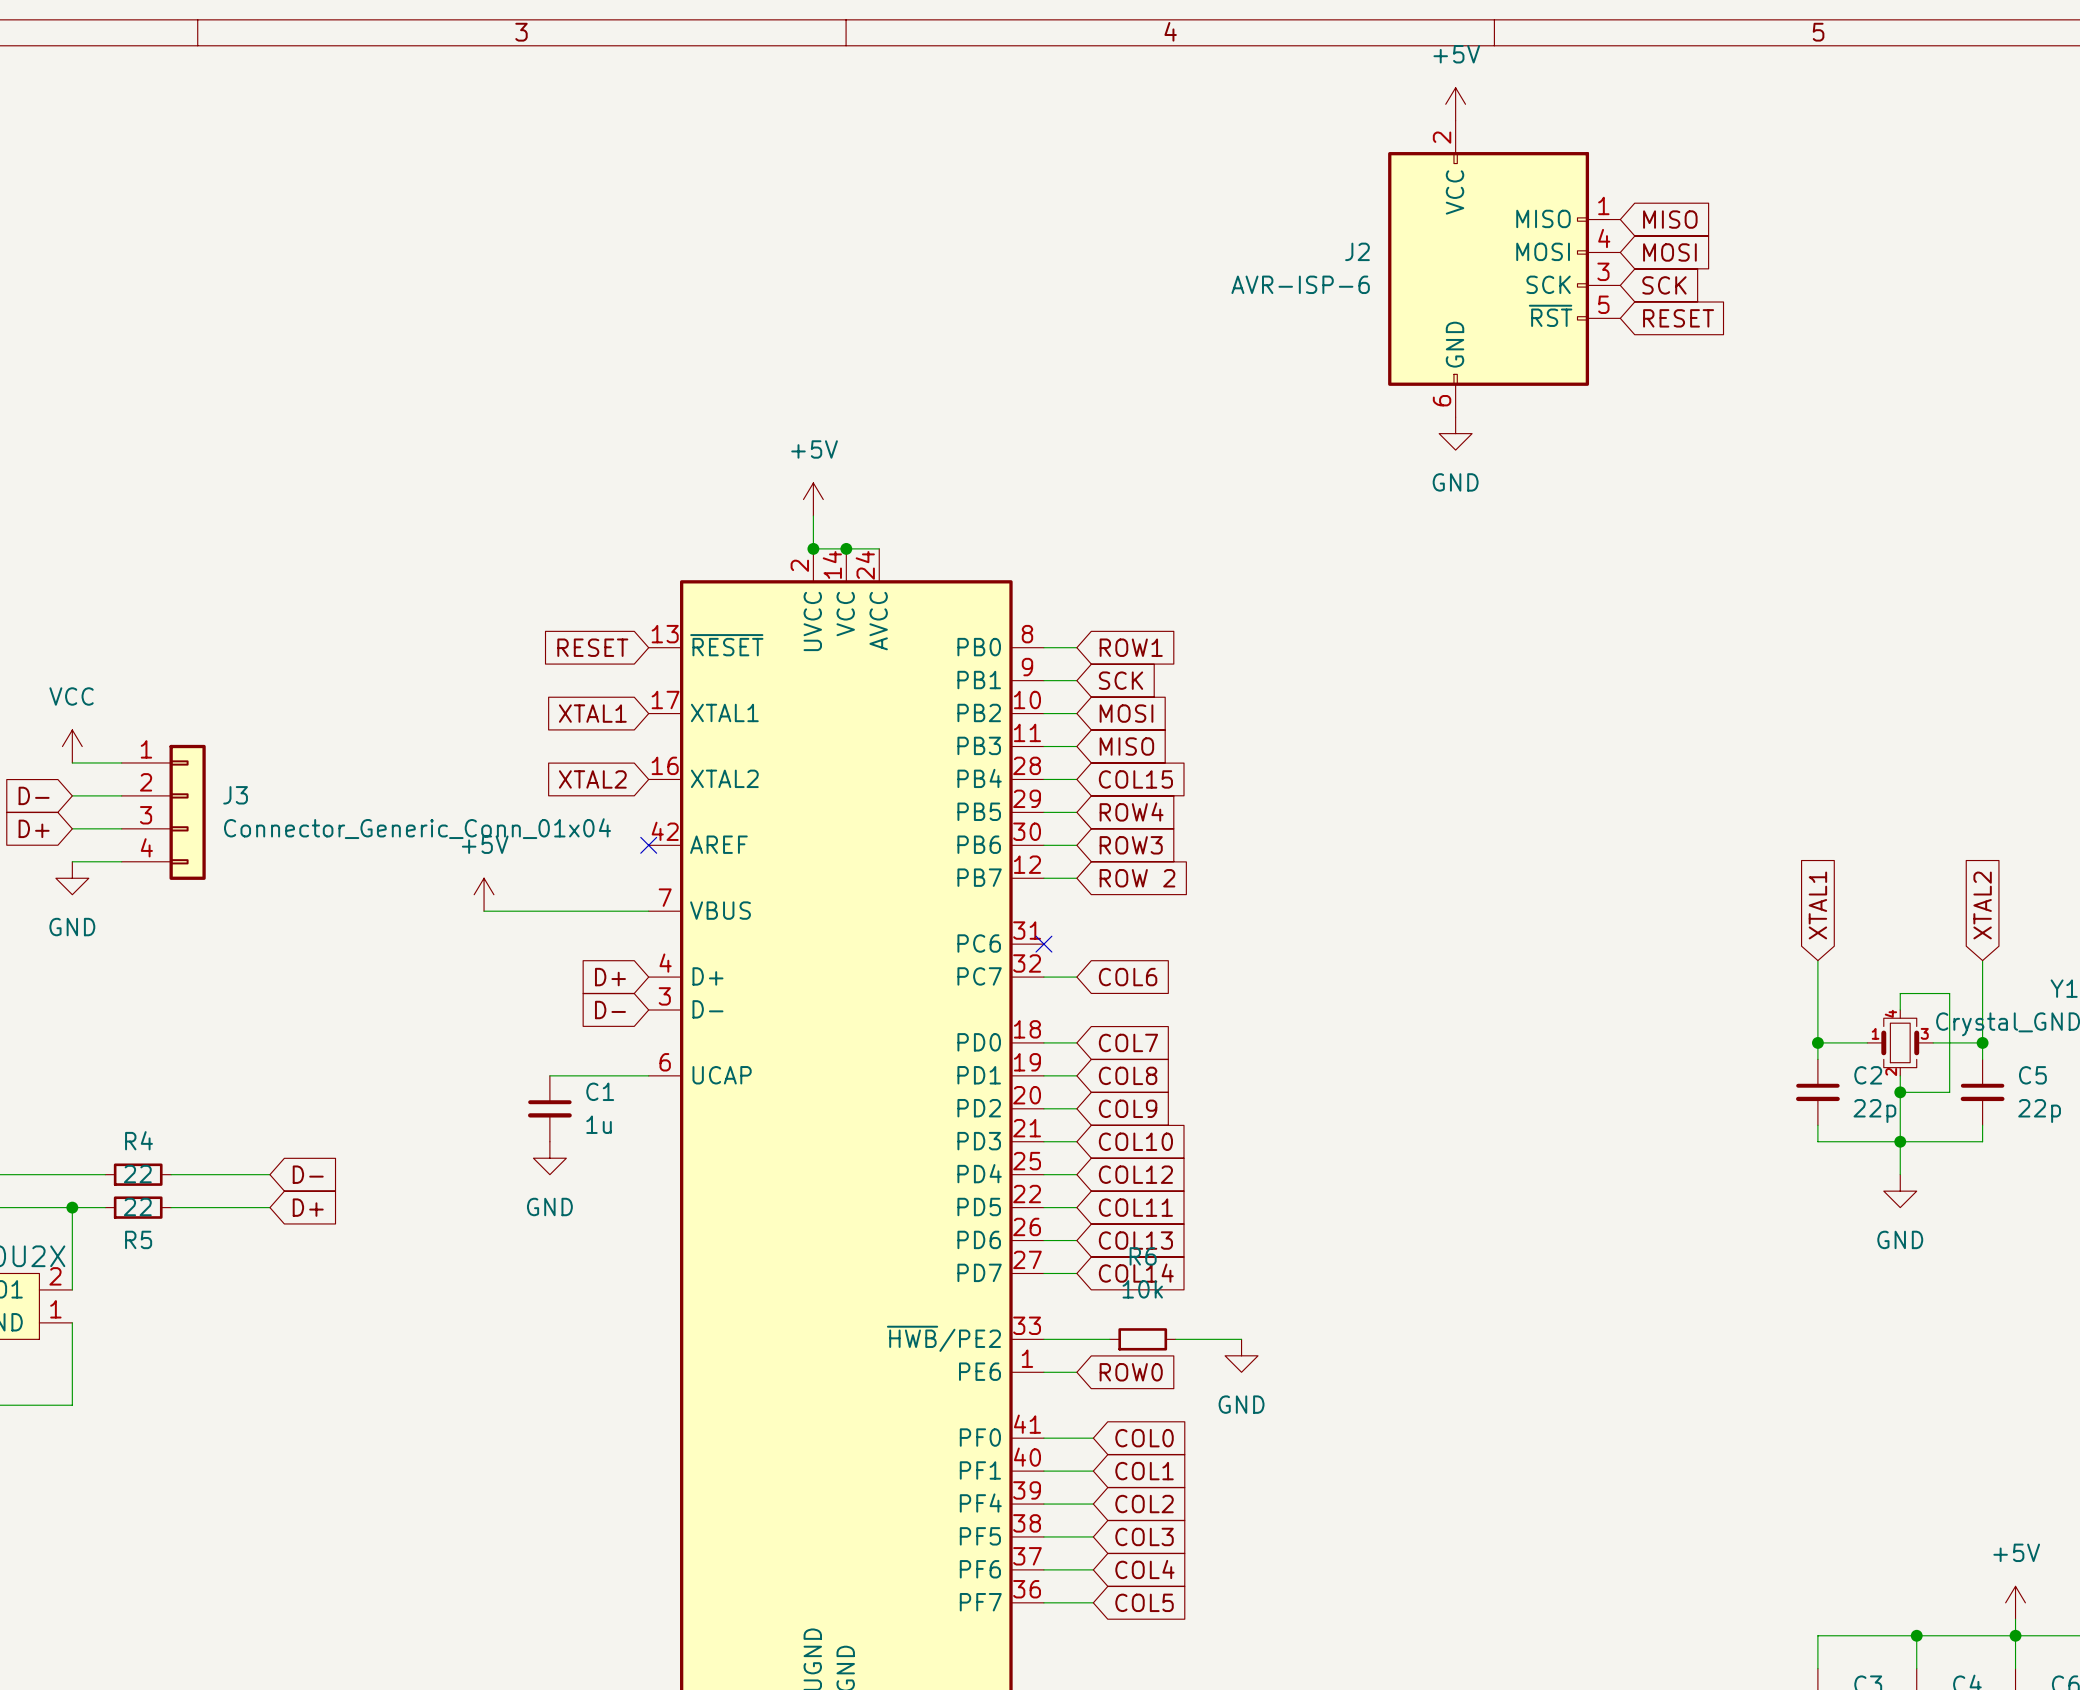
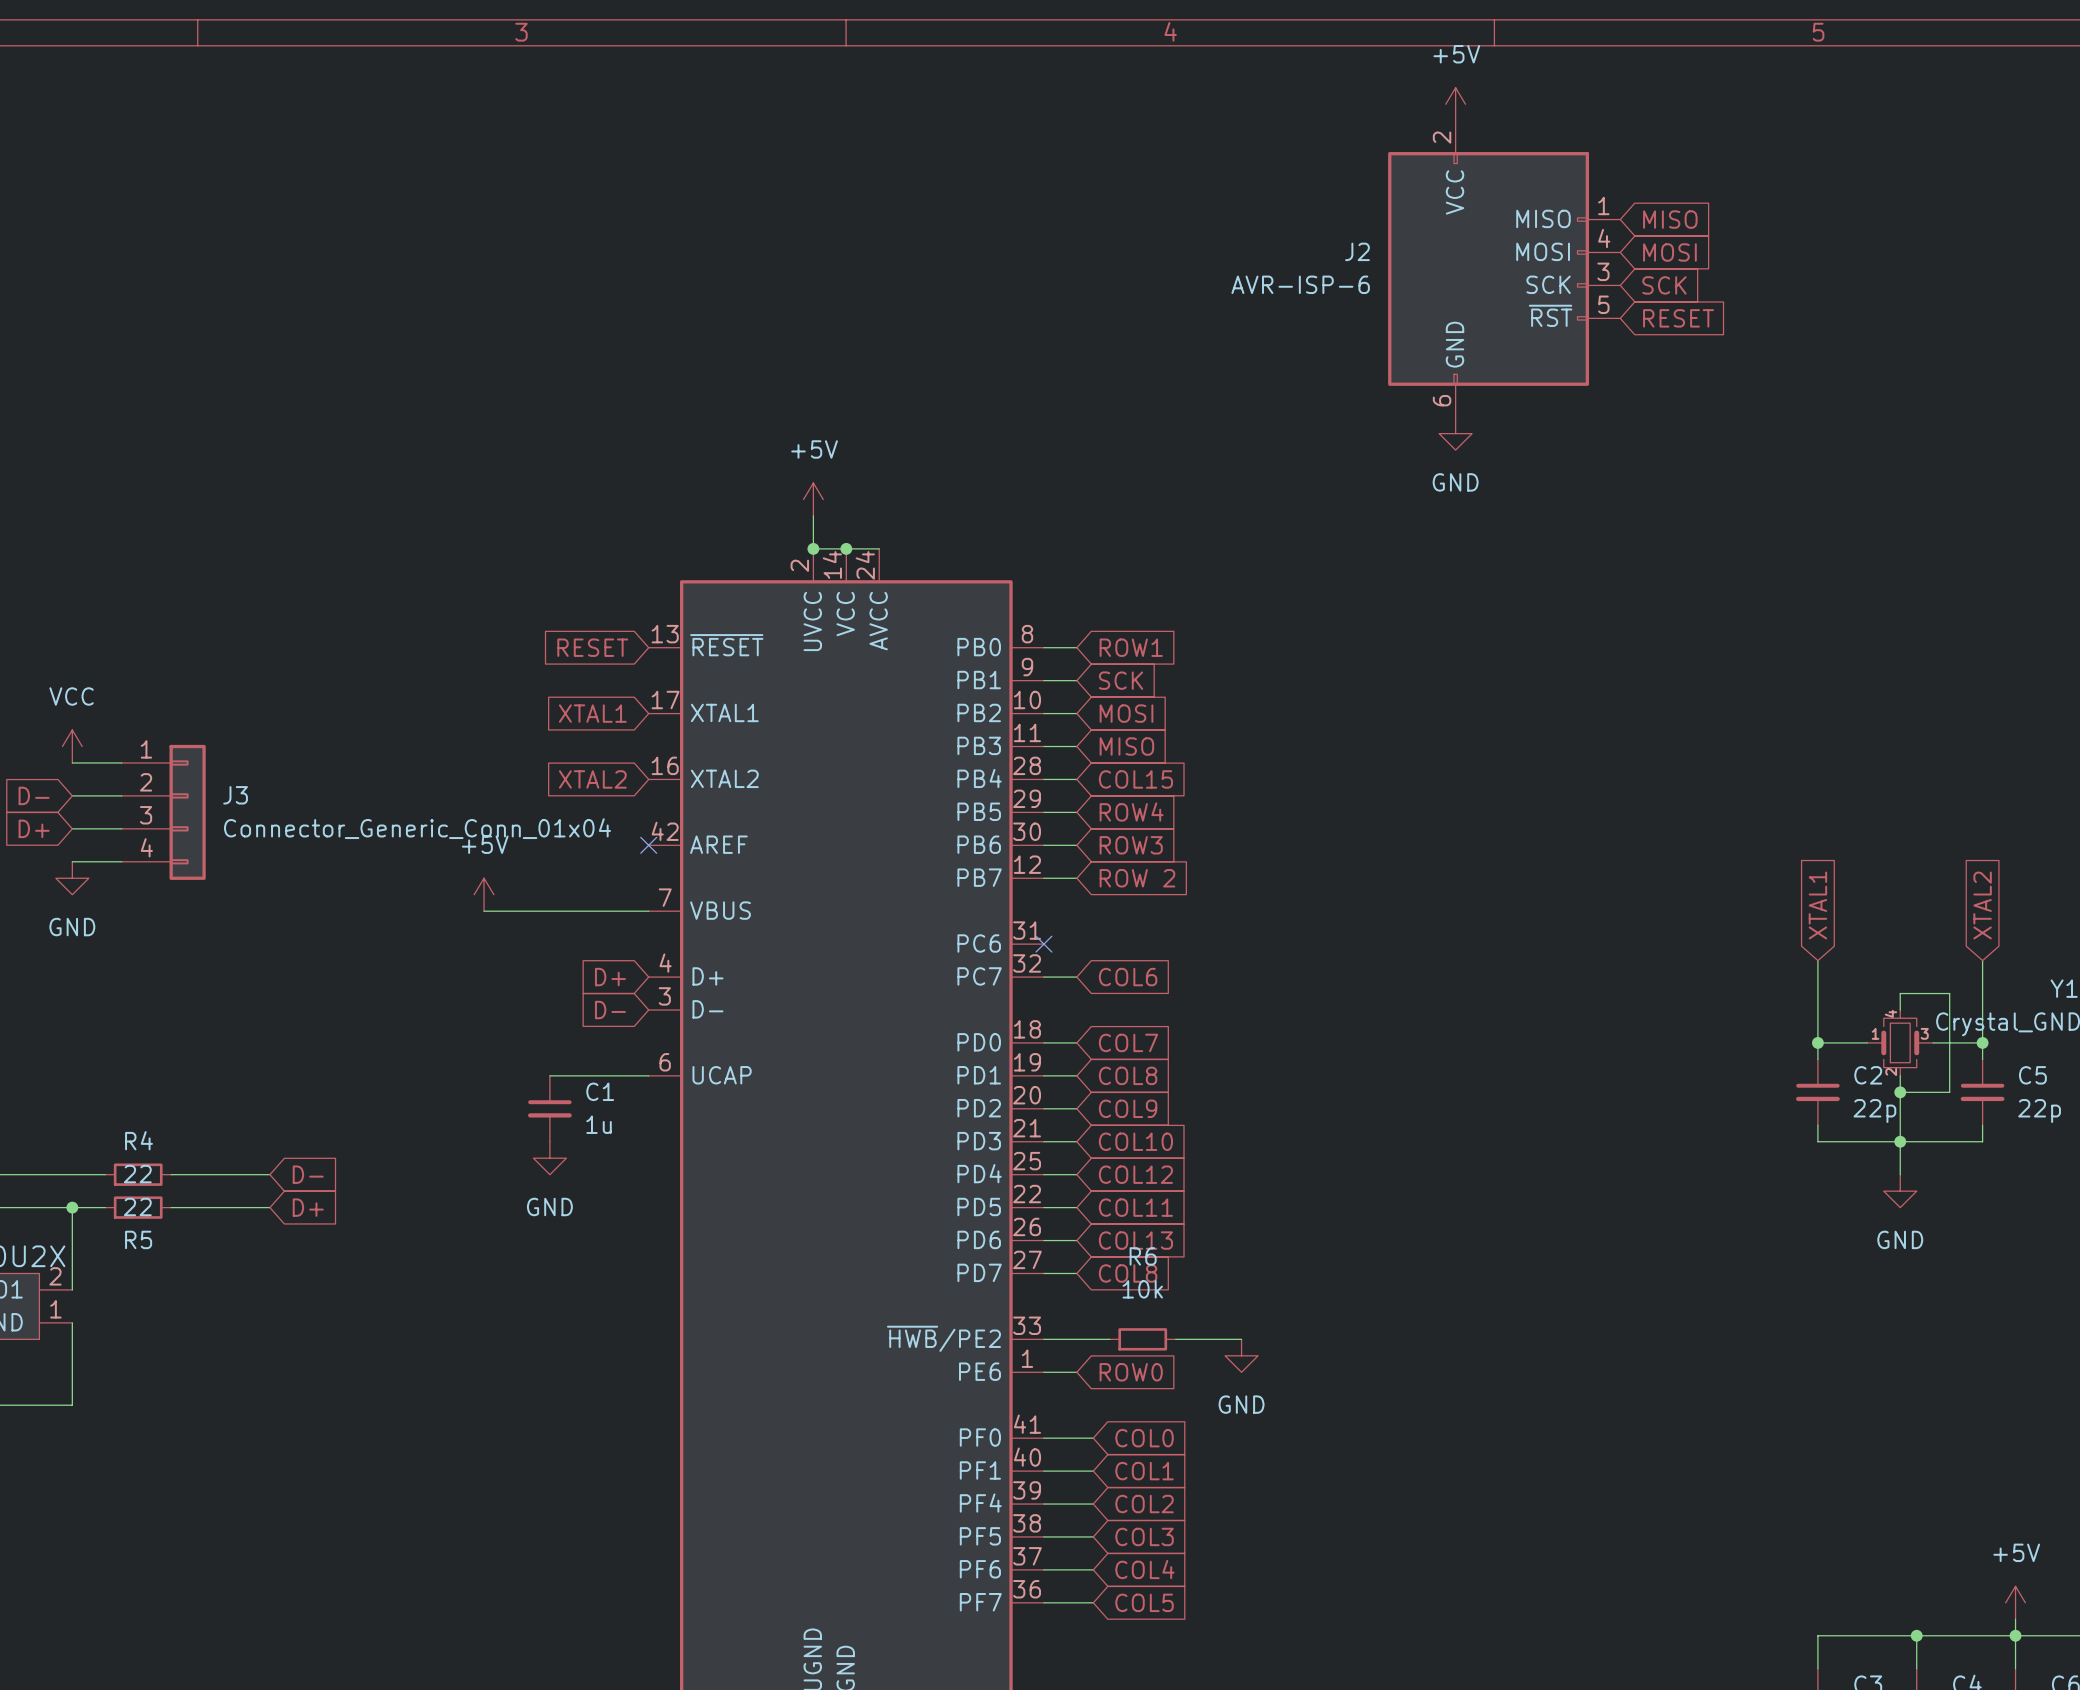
global label: COL14 (1136, 1273) -> COL8 (1128, 1273)

